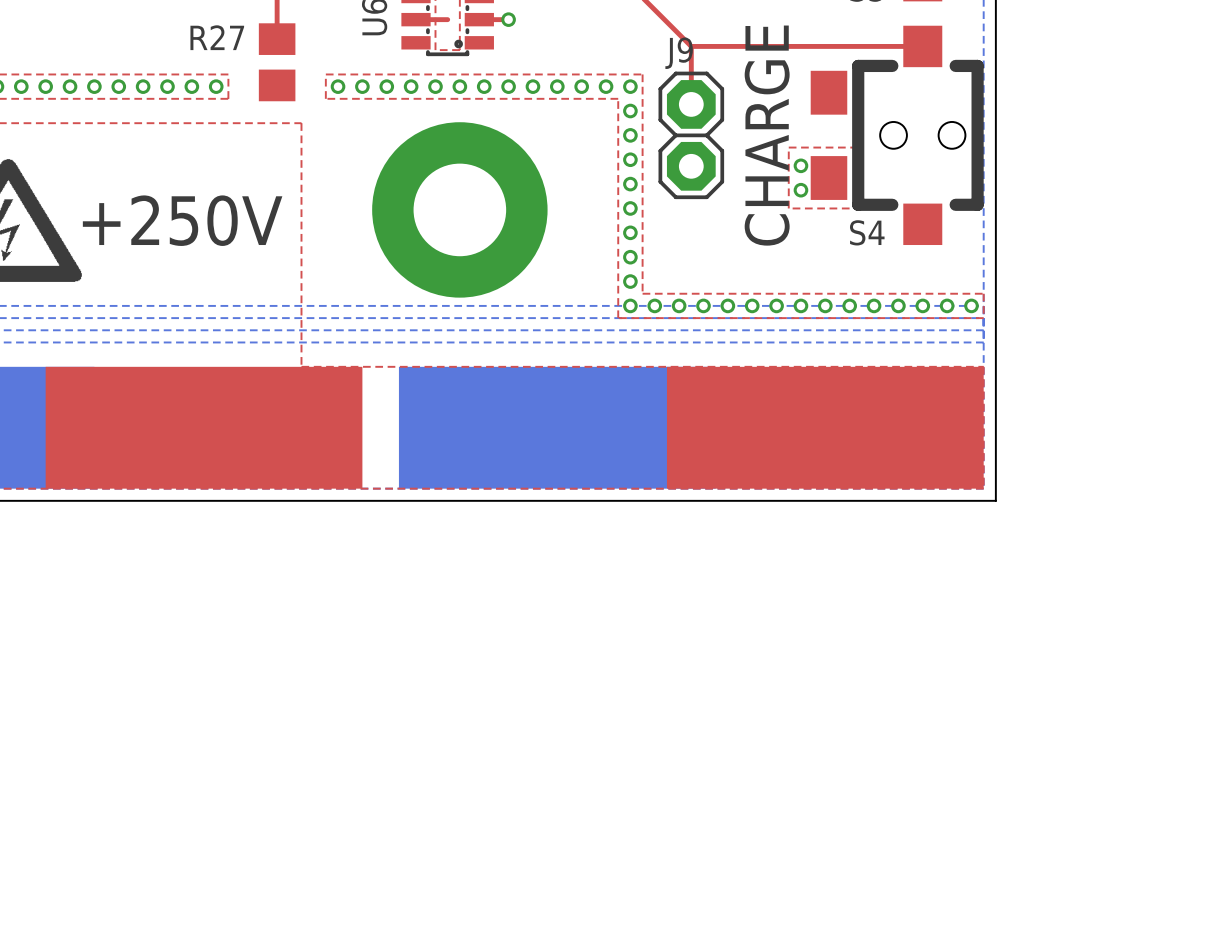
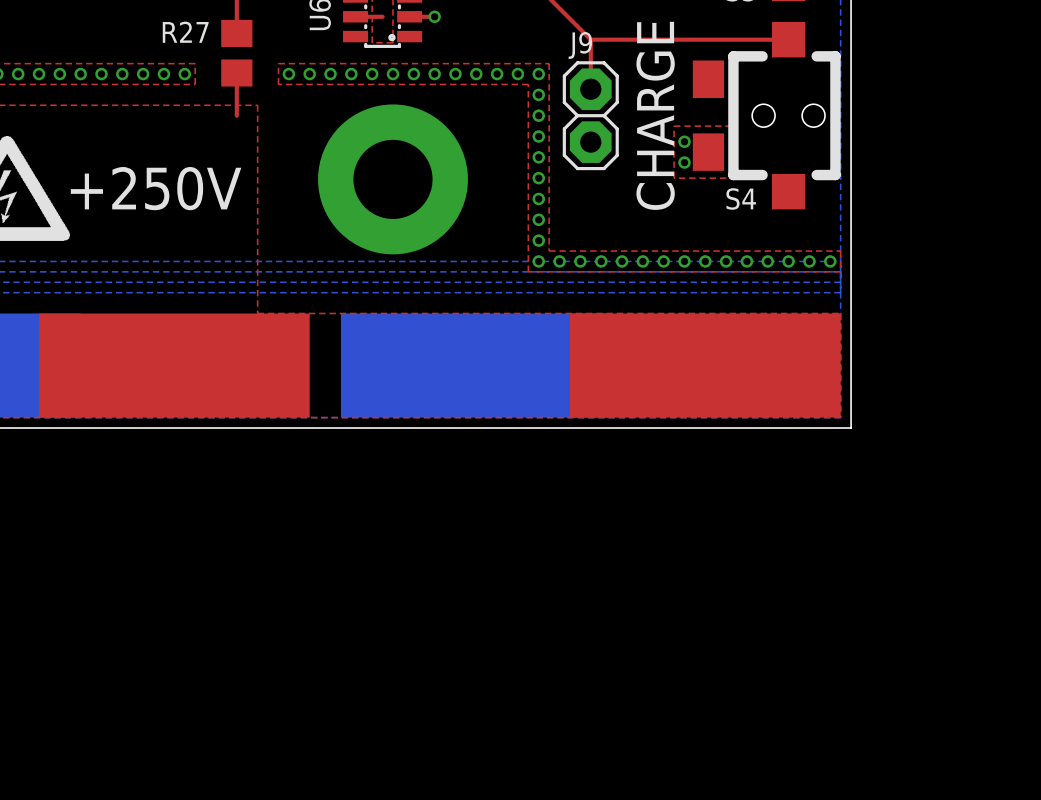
top track: none -> (236, 73) (236, 115)

